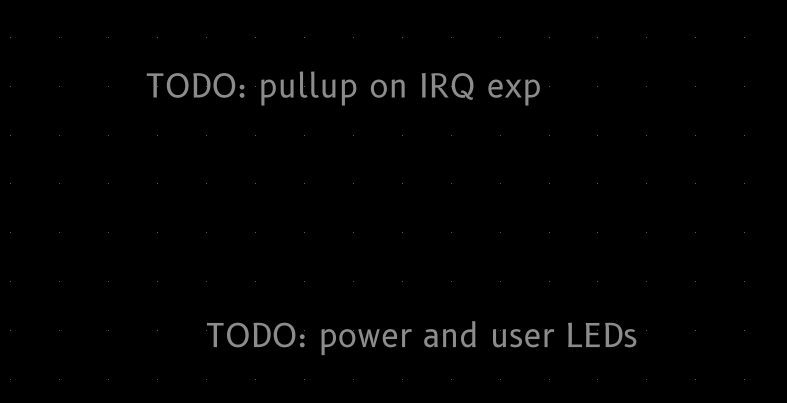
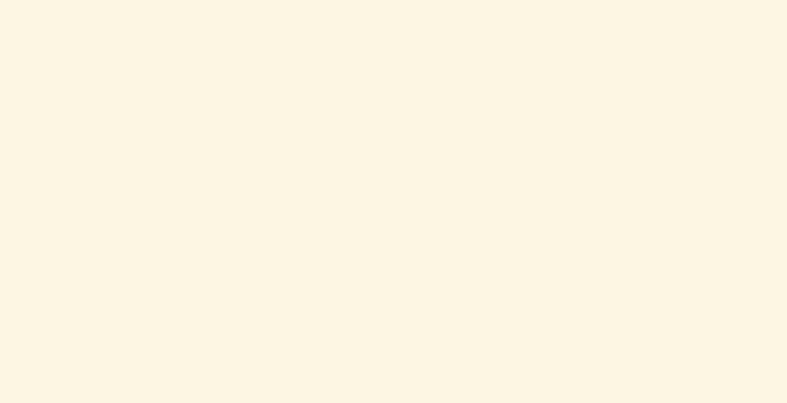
text: TODO: pullup on IRQ exp (343, 88) -> none
text: TODO: power and user LEDs (421, 338) -> none

